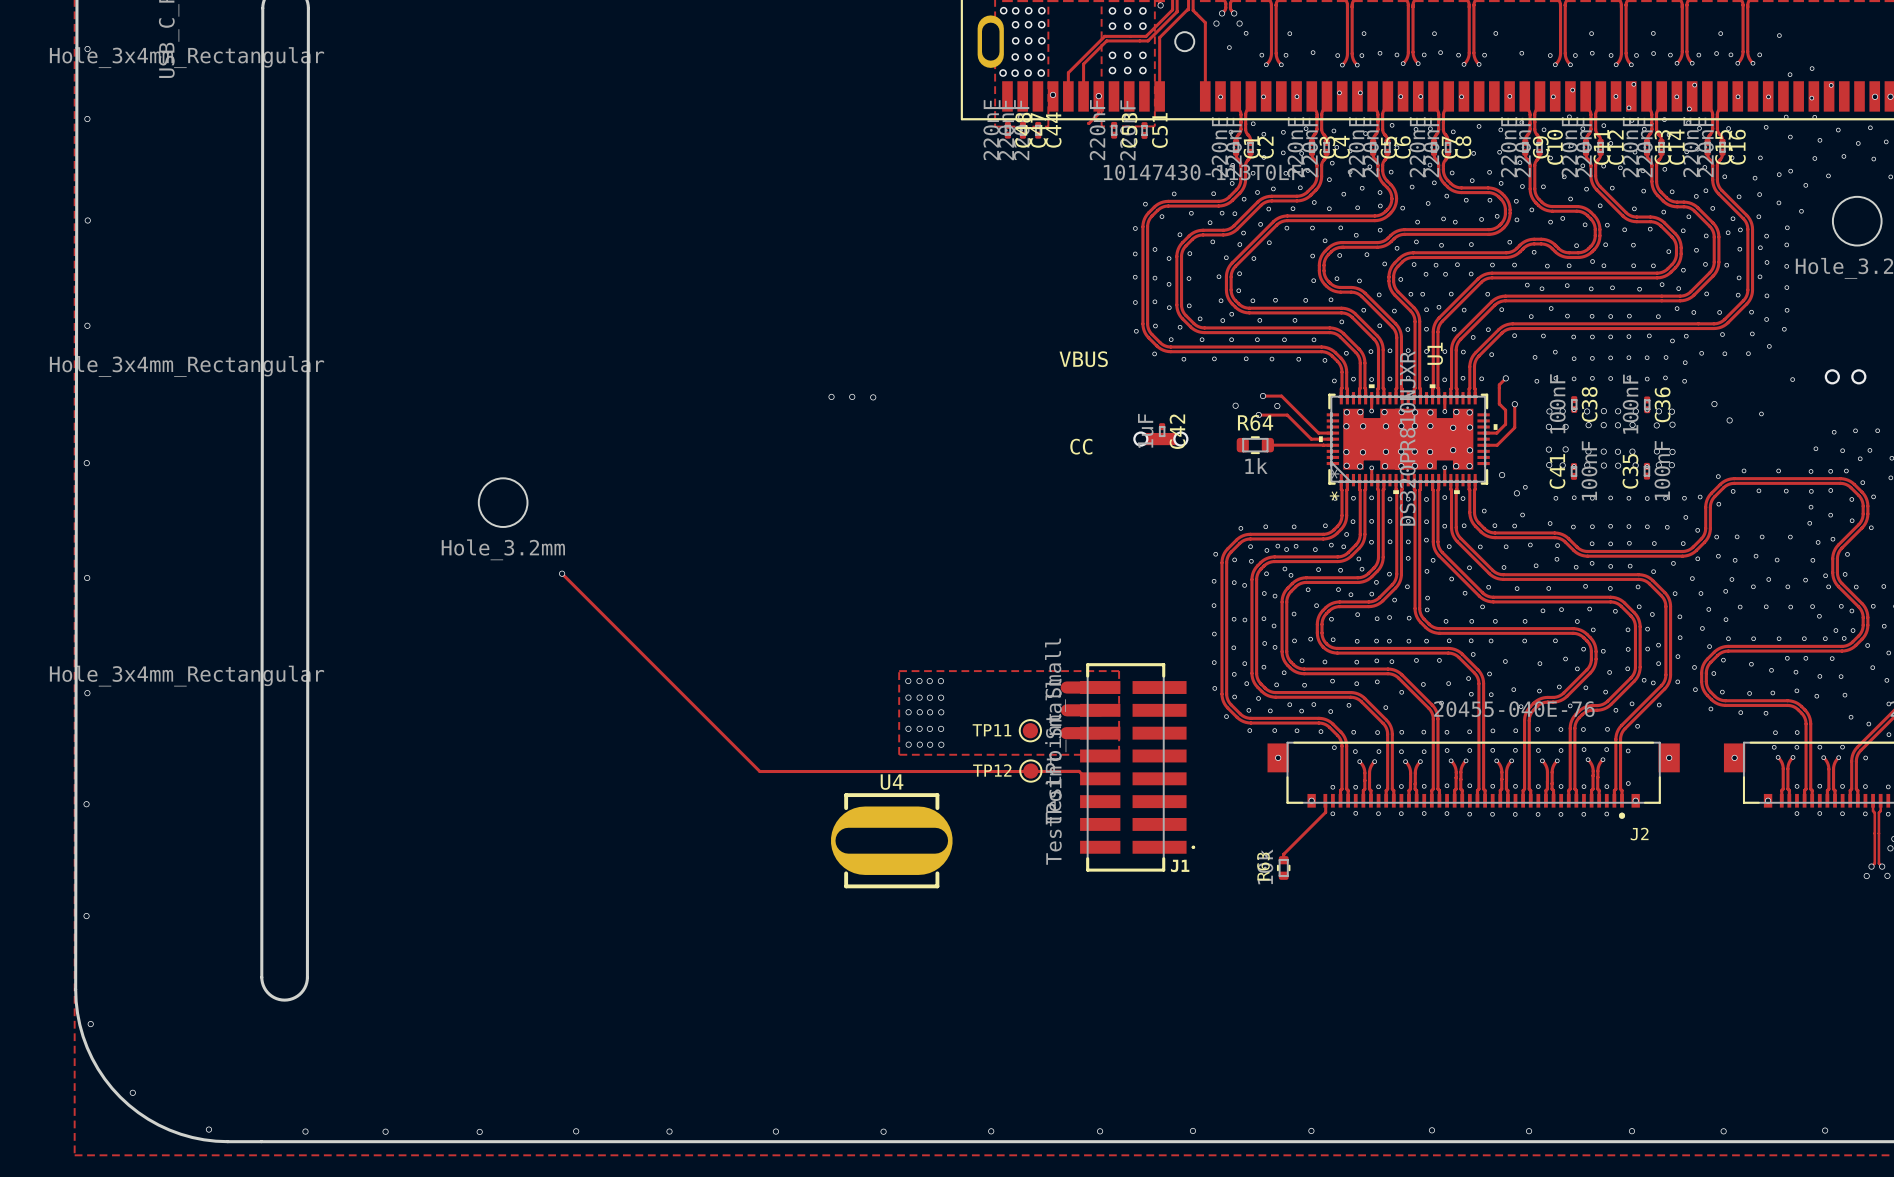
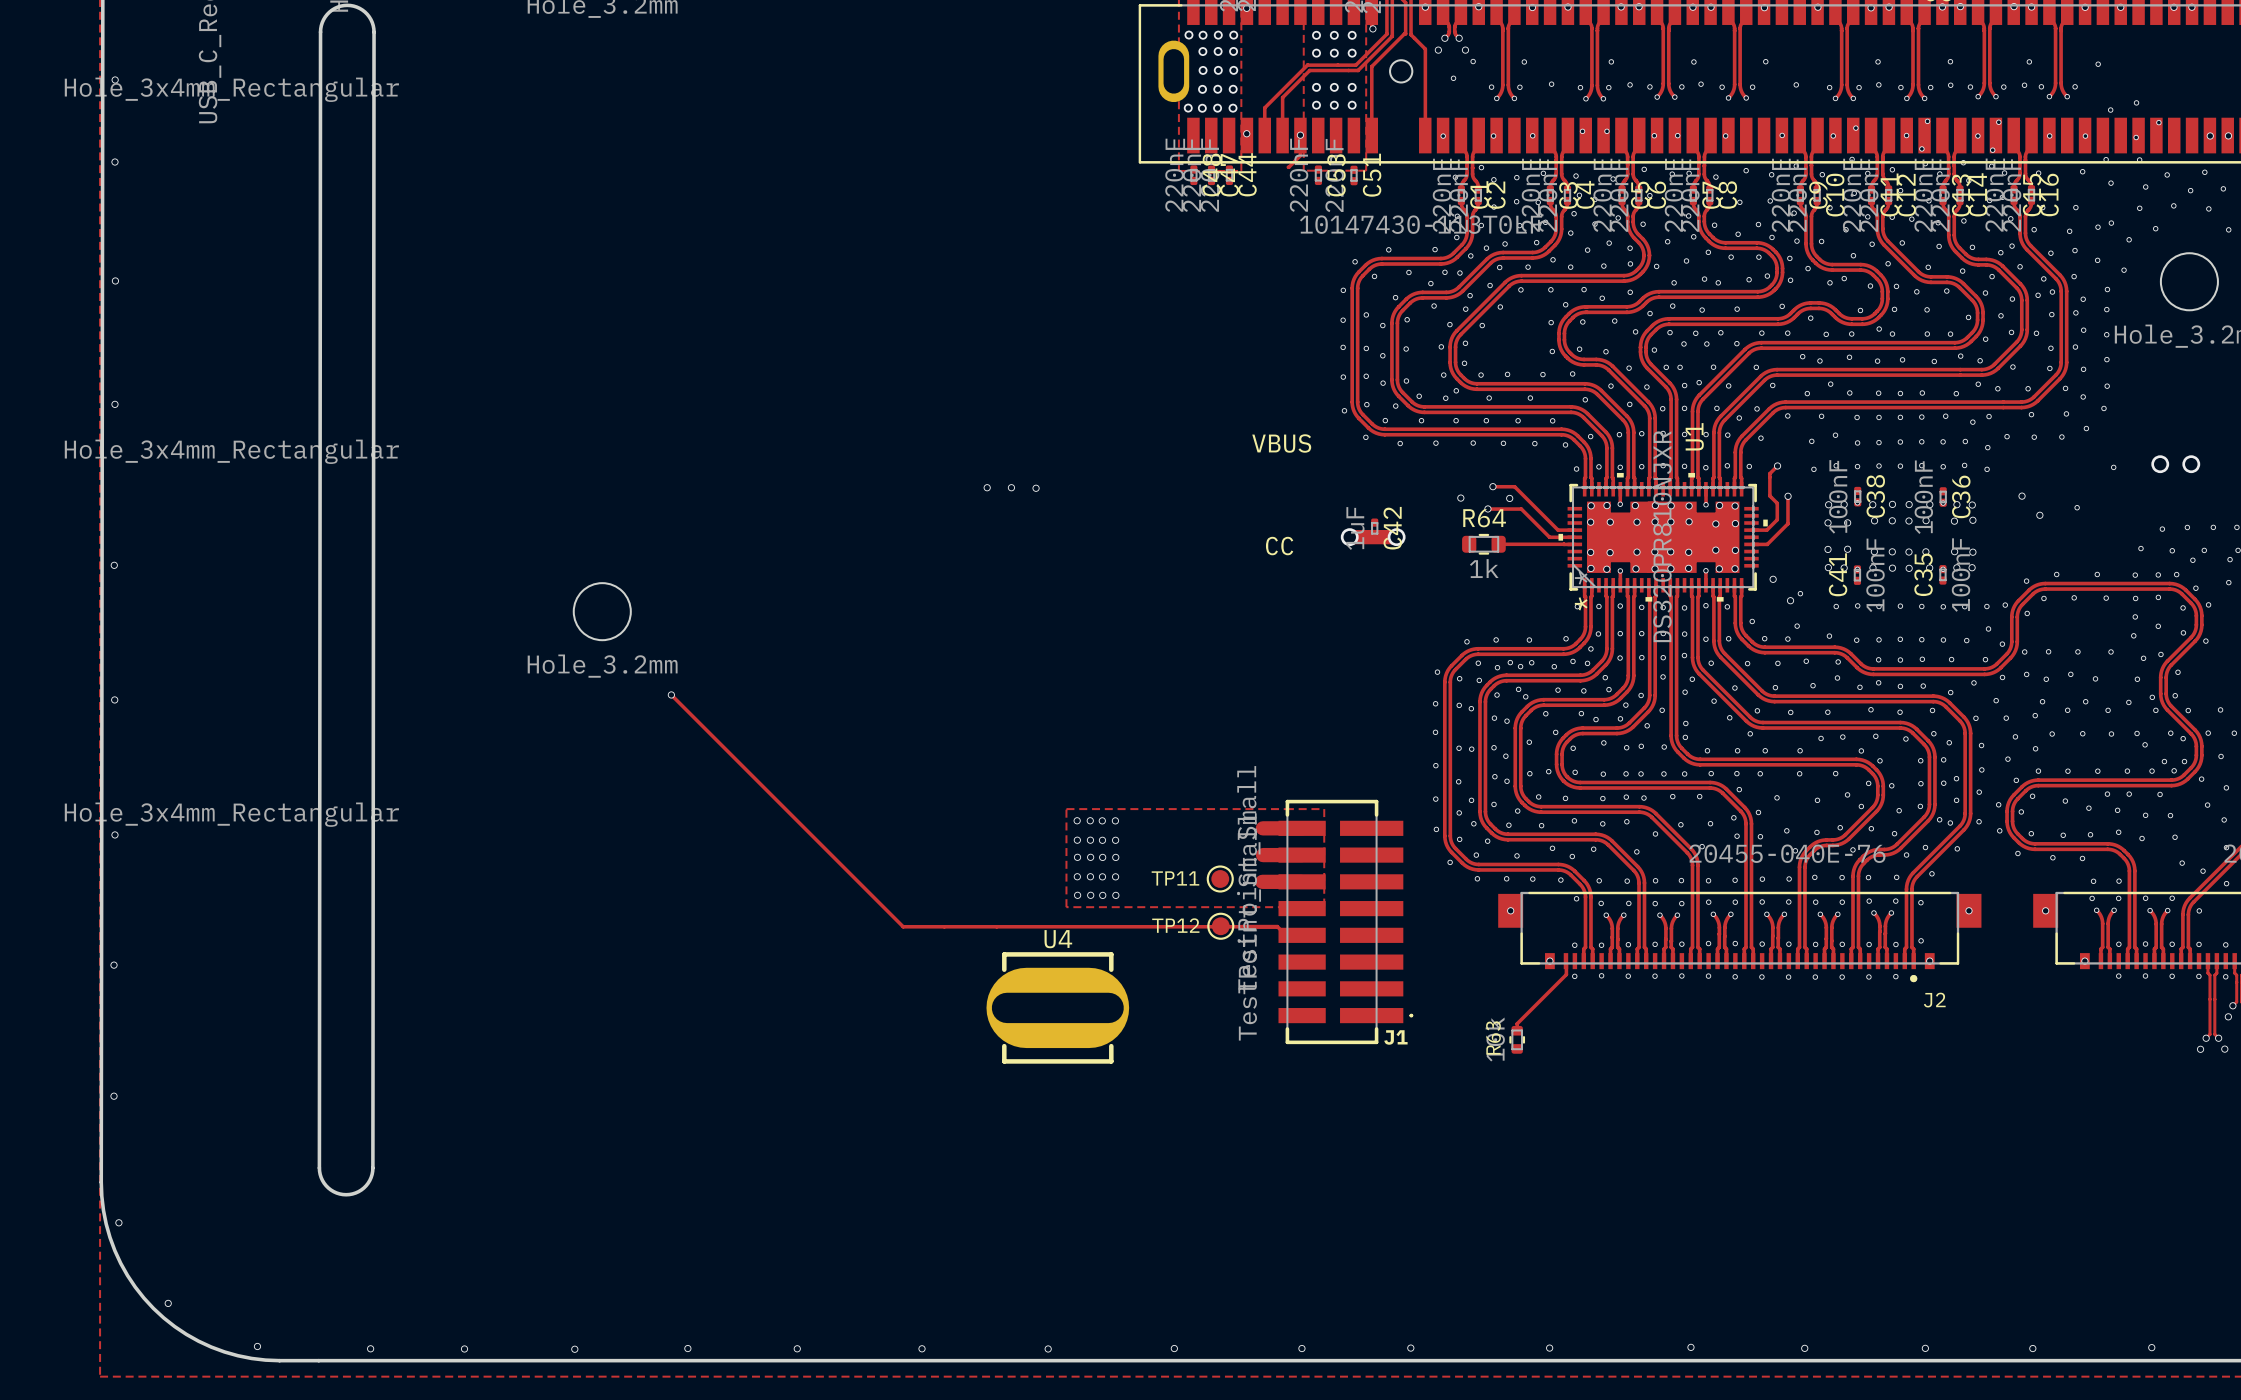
via: (1289, 704) -> none
via: (1270, 710) -> none
via: none -> (1517, 855)
via: (1301, 711) -> none

